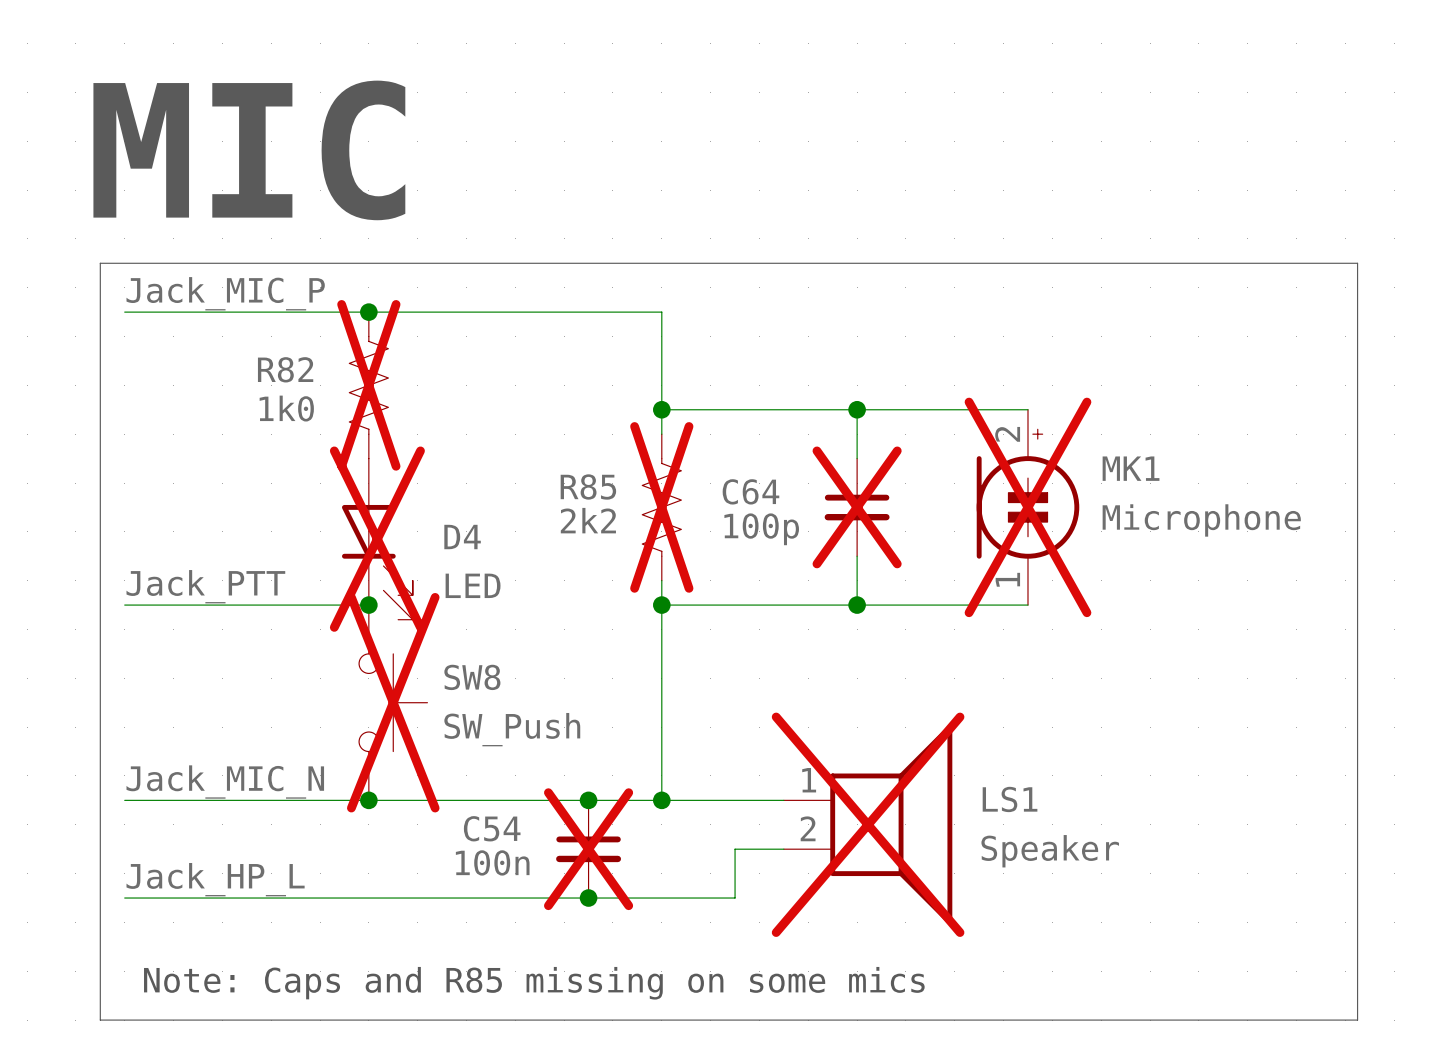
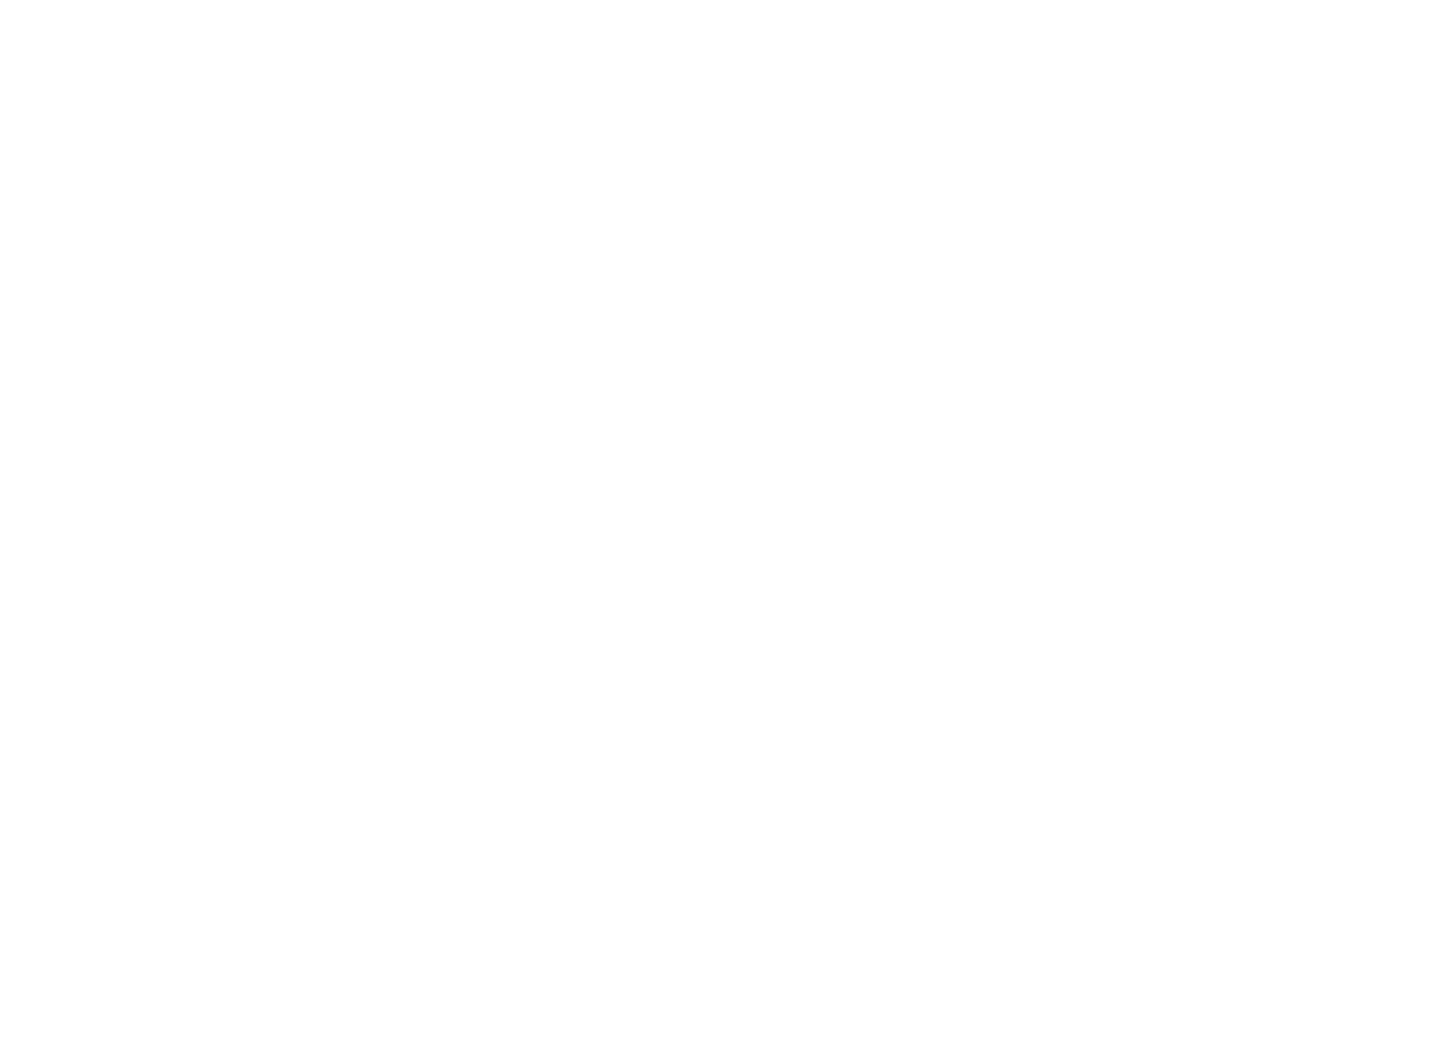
text: MIC (249, 150) -> none
line: (100, 263) (100, 1020) (1357, 1020) (1357, 263) (100, 263) -> none
label: Jack_MIC_P (225, 293) -> none
wire: (124, 312) (661, 312) (661, 434) -> none
junction: (368, 312) -> none
R82: 1k0 (368, 385) -> none
wire: (661, 409) (1027, 409) -> none
junction: (661, 409) -> none
wire: (857, 409) (857, 458) -> none
junction: (857, 409) -> none
R85: 2k2 (661, 507) -> none
C64: 100p (857, 507) -> none
MK1: Microphone (1027, 507) -> none
D4: LED (377, 539) -> none
wire: (857, 556) (857, 605) -> none
wire: (661, 580) (661, 800) -> none
label: Jack_PTT (205, 586) -> none
wire: (124, 605) (368, 605) -> none
junction: (368, 605) -> none
wire: (661, 605) (1027, 605) -> none
junction: (661, 605) -> none
junction: (857, 605) -> none
SW8: SW_Push (393, 702) -> none
label: Jack_MIC_N (225, 782) -> none
wire: (124, 800) (783, 800) -> none
junction: (368, 800) -> none
junction: (588, 800) -> none
junction: (661, 800) -> none
LS1: Speaker (868, 824) -> none
C54: 100n (588, 849) -> none
wire: (783, 849) (735, 849) (735, 898) (124, 898) -> none
label: Jack_HP_L (215, 879) -> none
junction: (588, 898) -> none
text: Note: Caps and R85 missing on some mics (534, 983) -> none

